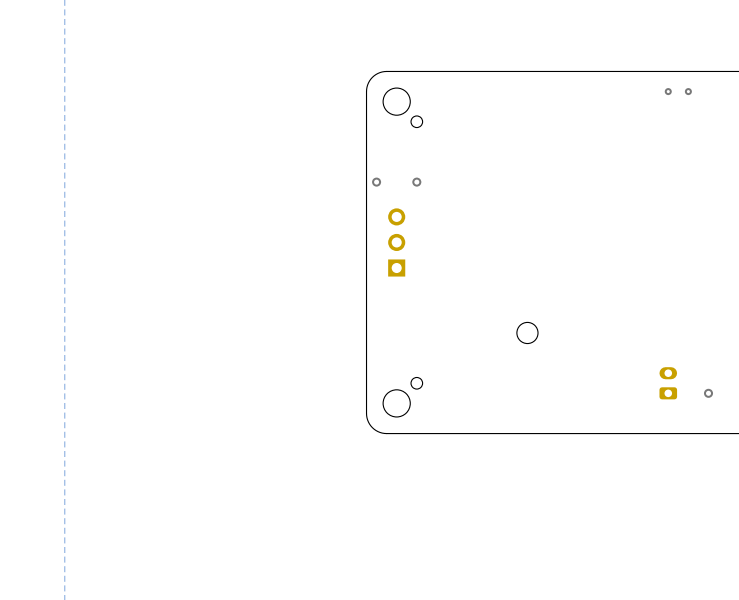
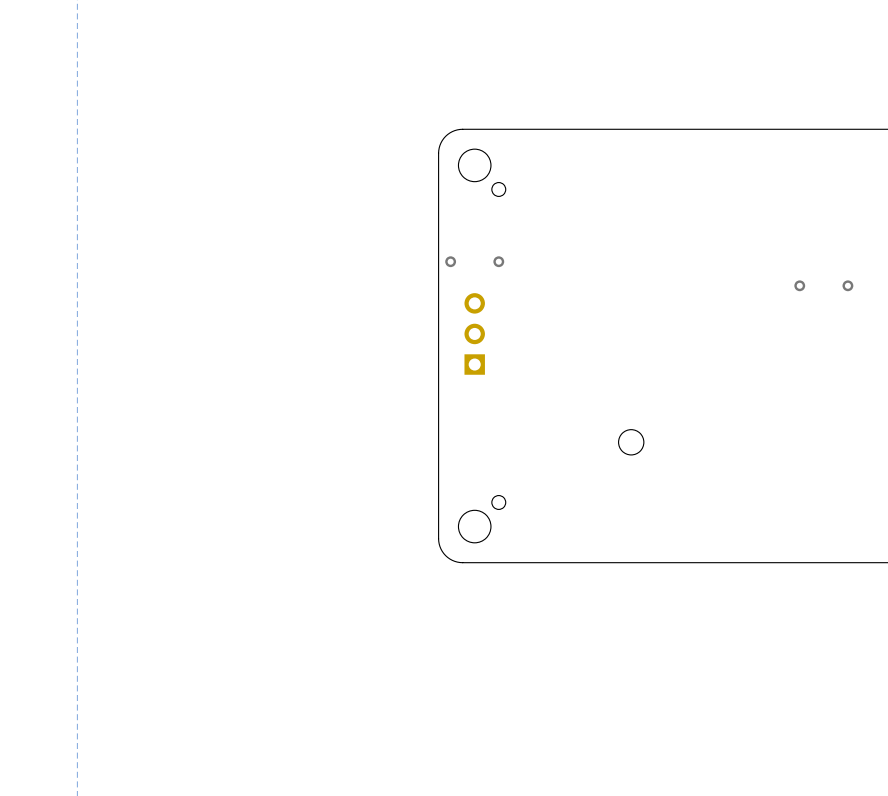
via: (668, 91) -> none
via: (688, 91) -> none
via: none -> (799, 285)
via: none -> (847, 285)
part: (668, 383) -> none
via: (708, 393) -> none

